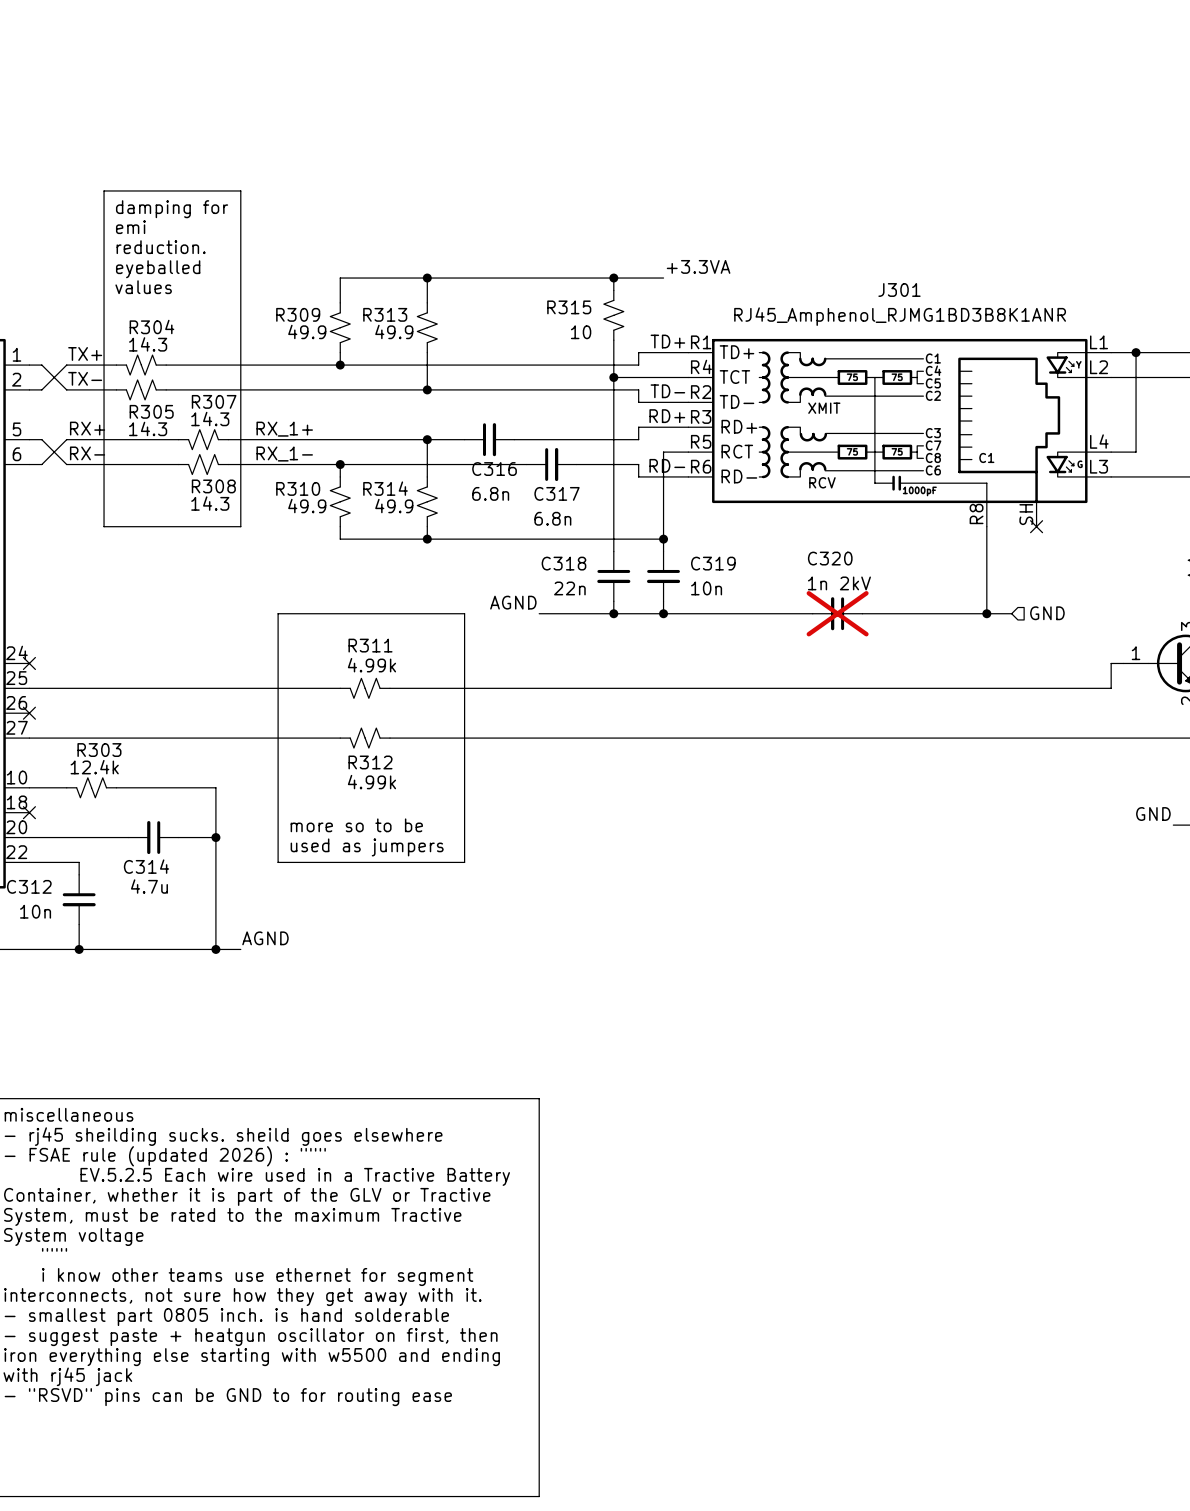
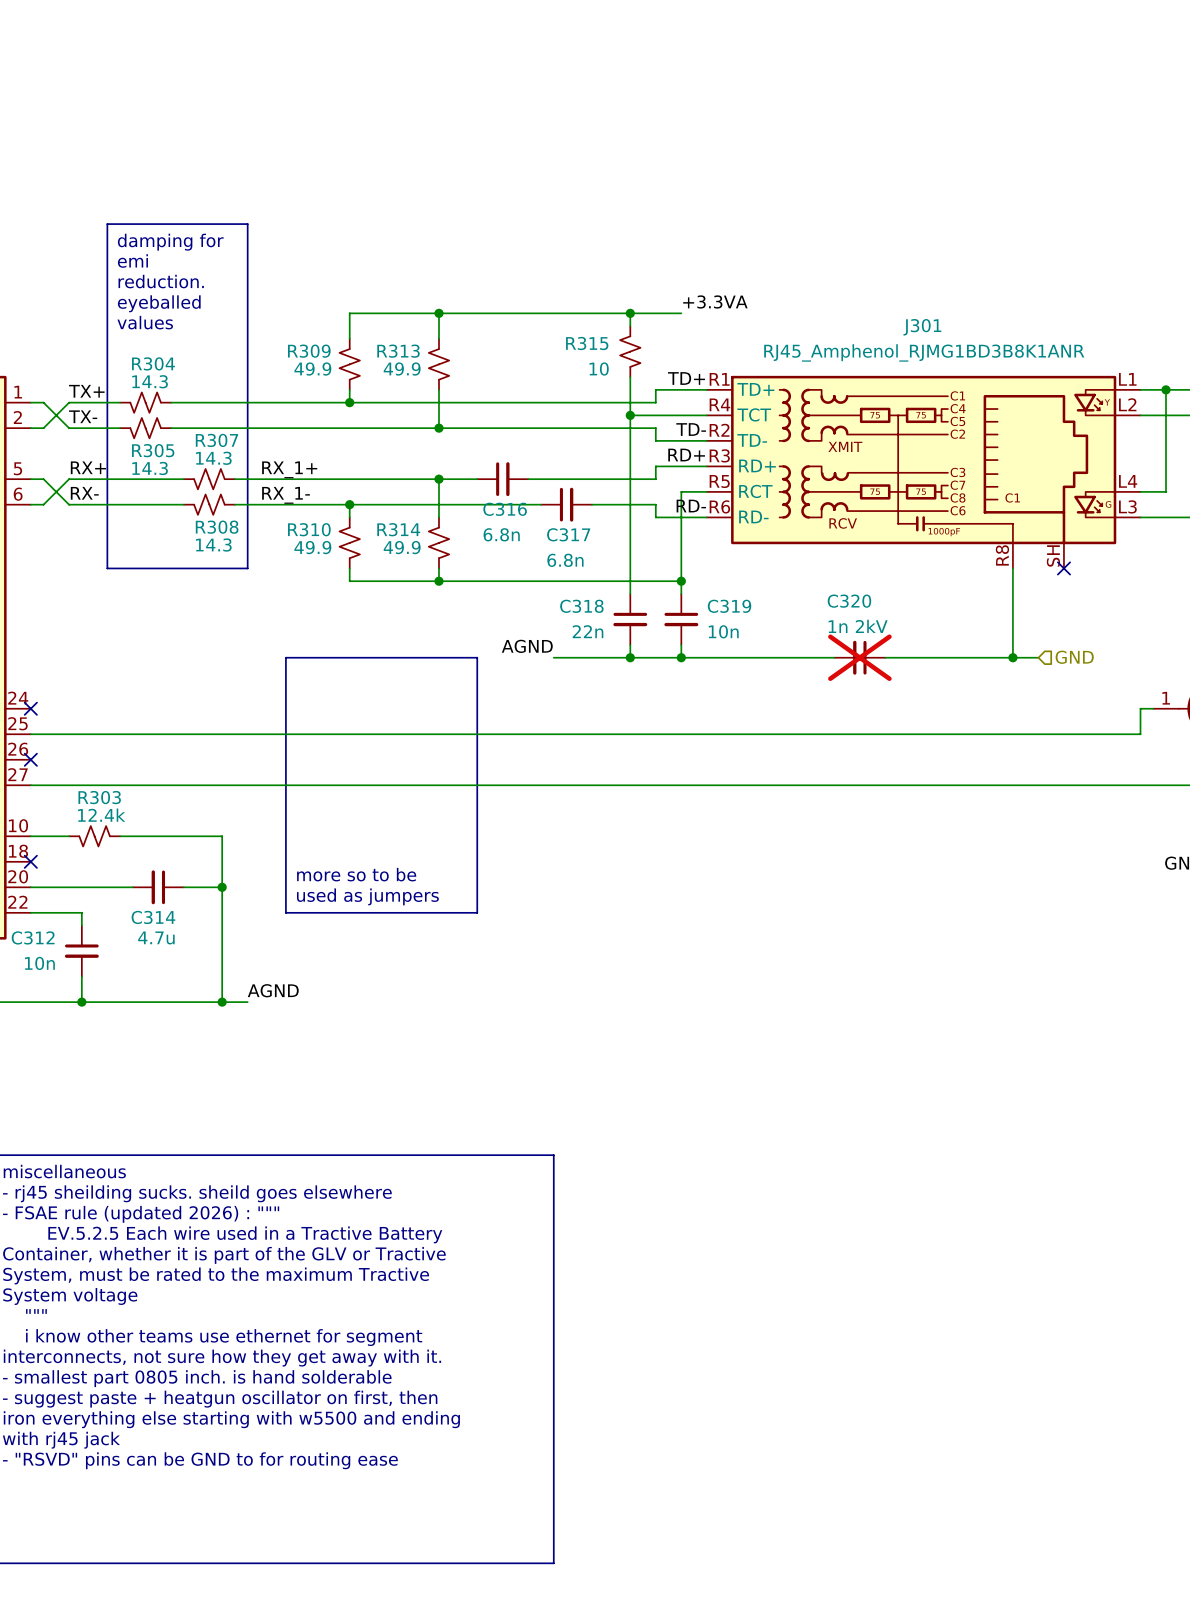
R311: 4.99k (365, 688) -> none
R312: 4.99k (365, 738) -> none

